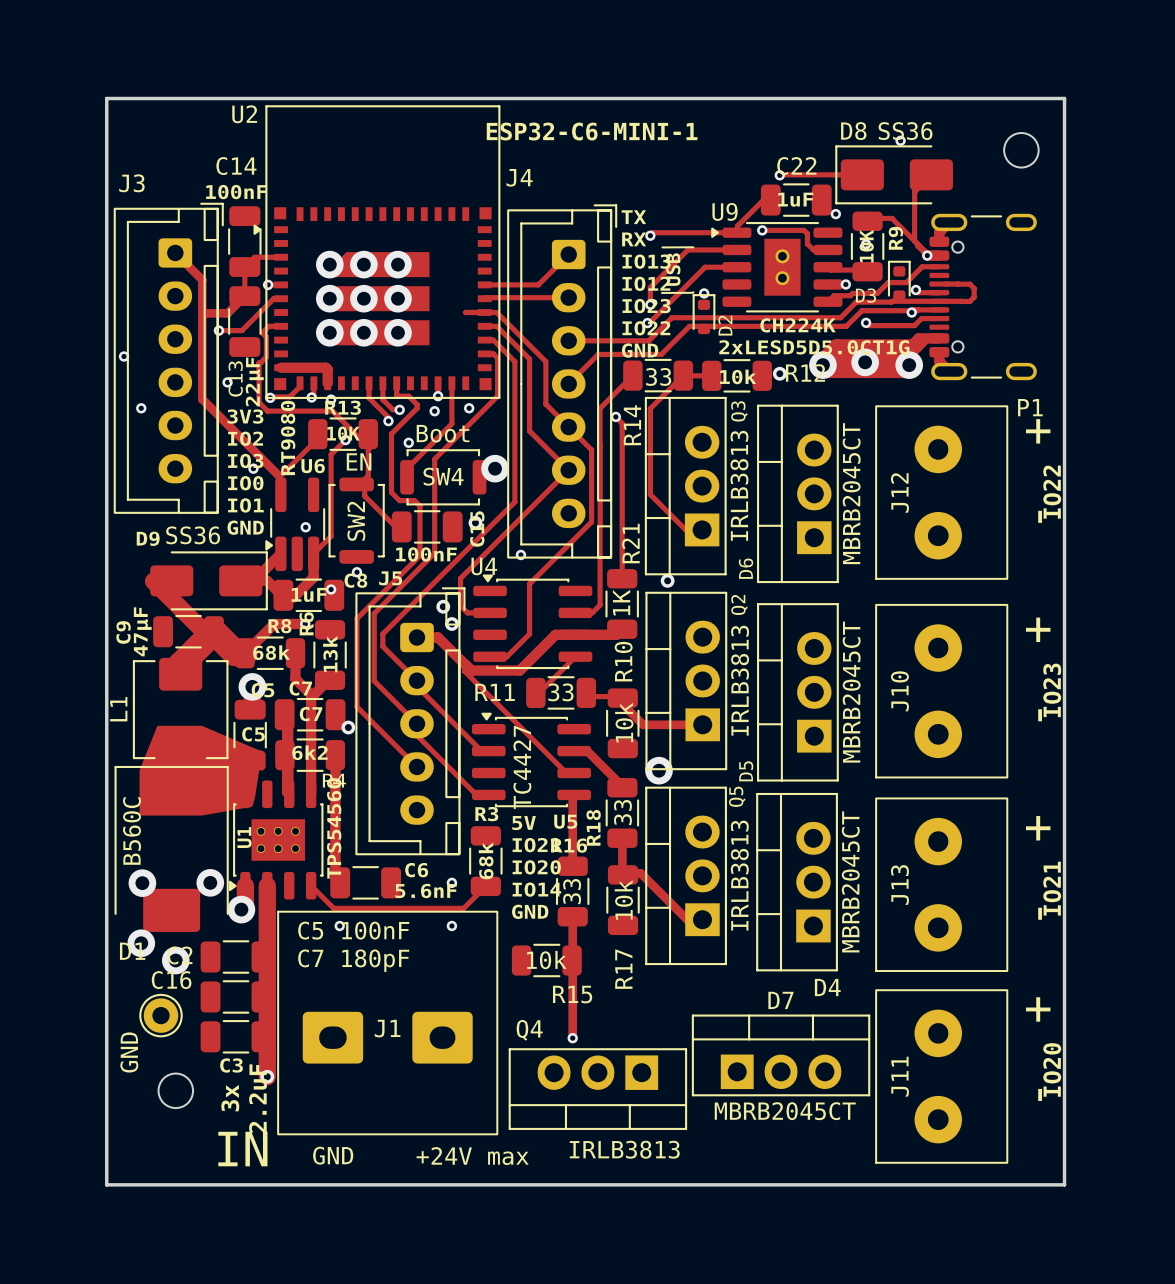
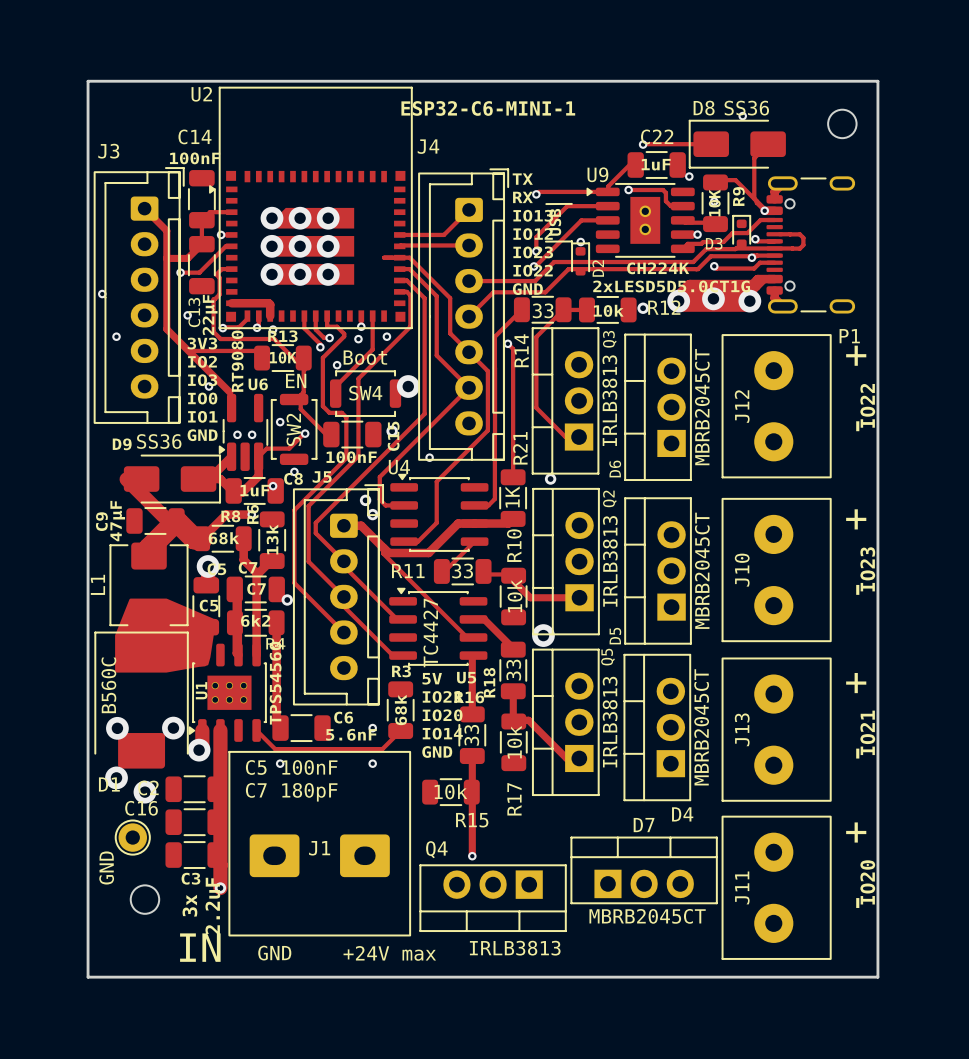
track: (317, 438) (280, 476) -> (262, 361) (262, 358) (254, 350) (189, 350) (231, 392)
track: (345, 440) (331, 454) (331, 536) (323, 543) -> (305, 433) (289, 448) (266, 448)
via: (345, 440) -> none
via: none -> (280, 422)
via: none -> (305, 433)
via: none -> (237, 434)

